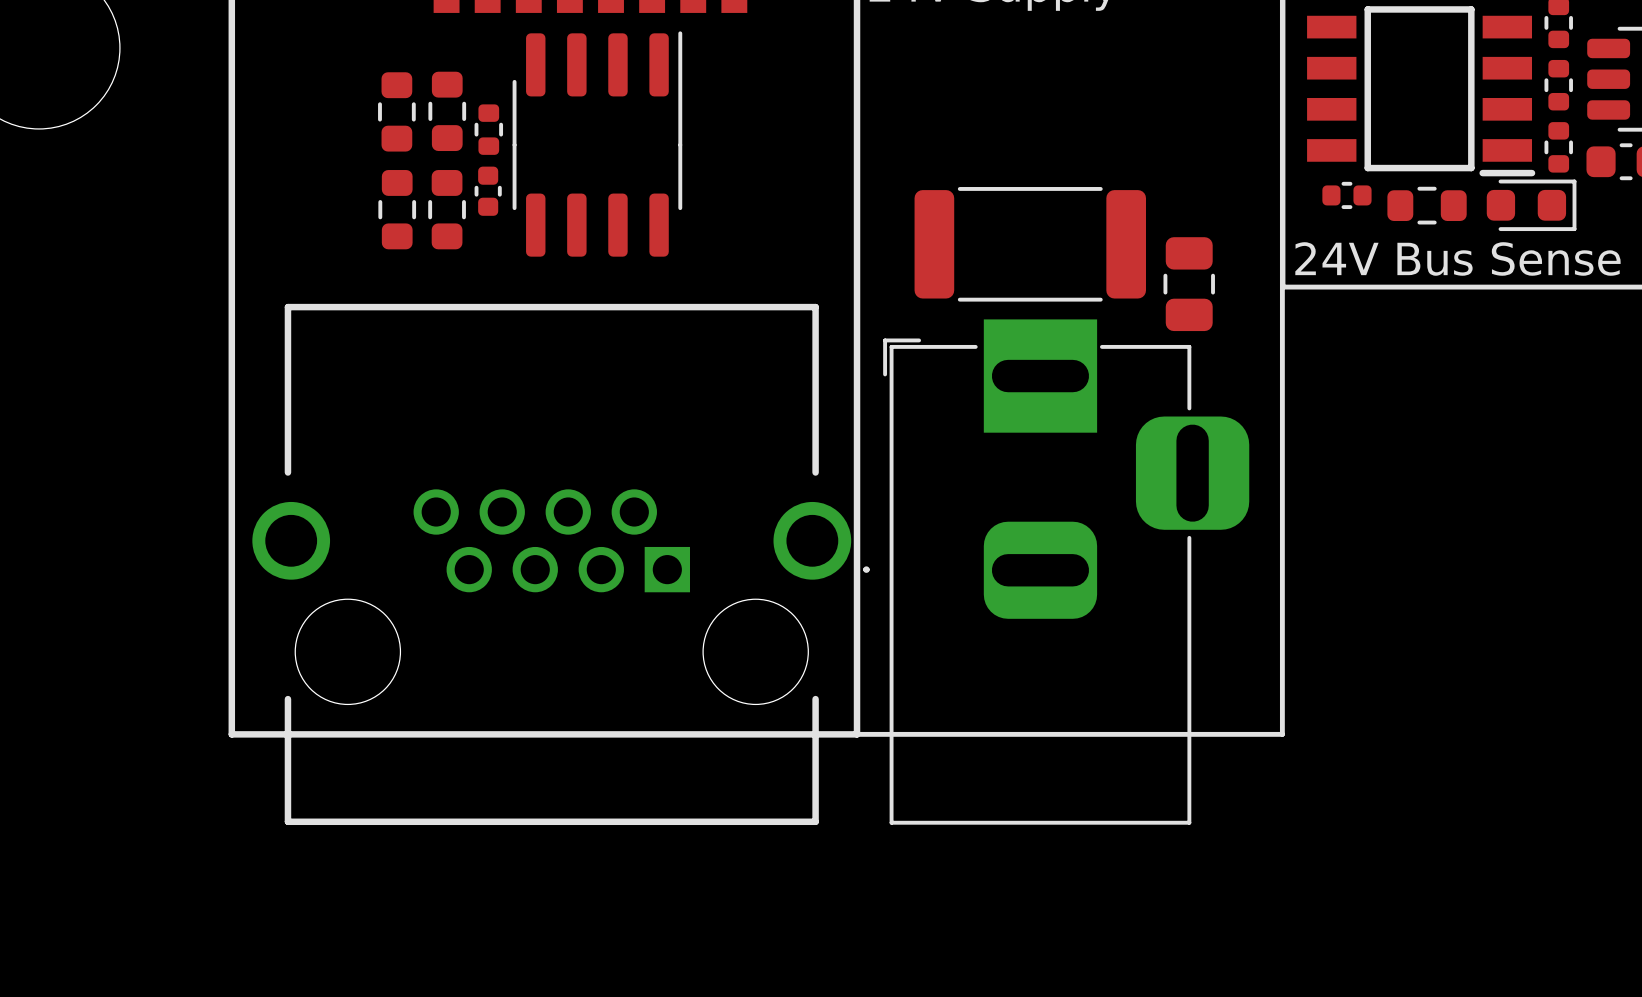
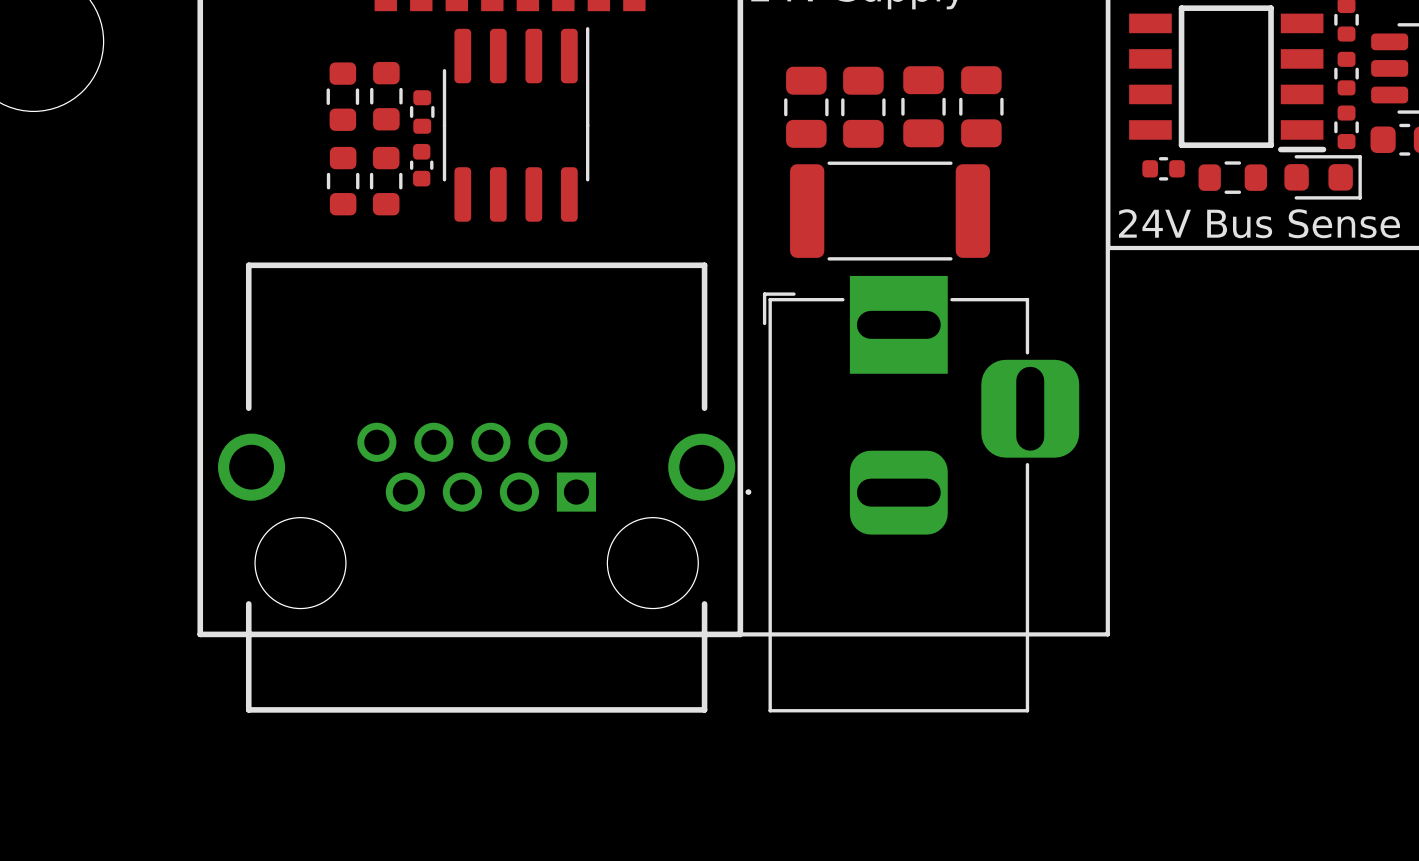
part: none -> (923, 106)
part: none -> (981, 106)
part: none -> (806, 107)
part: none -> (863, 107)
part: (1189, 284) -> none

